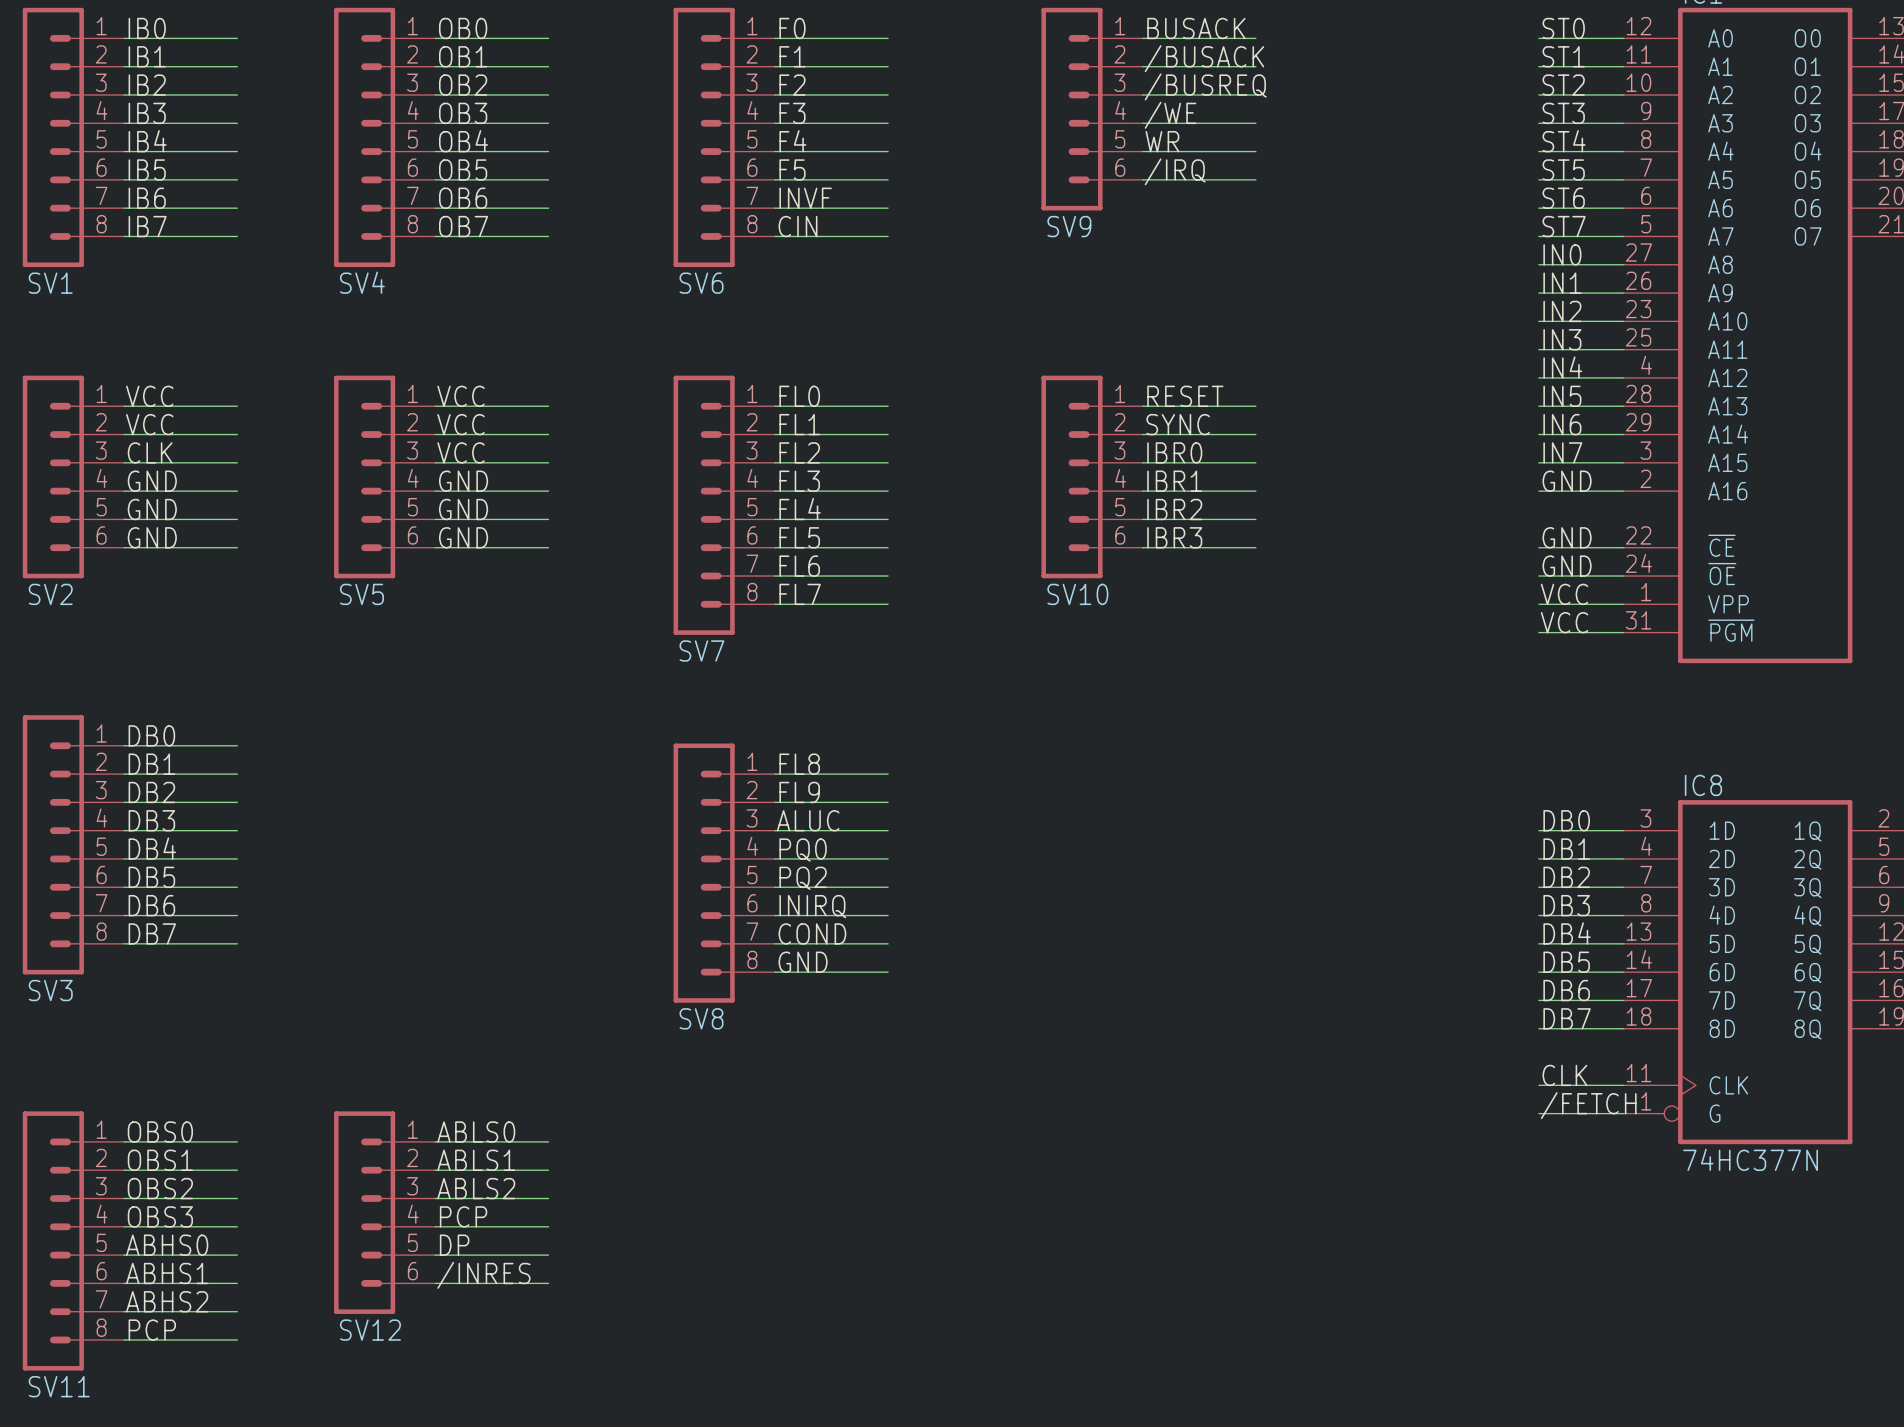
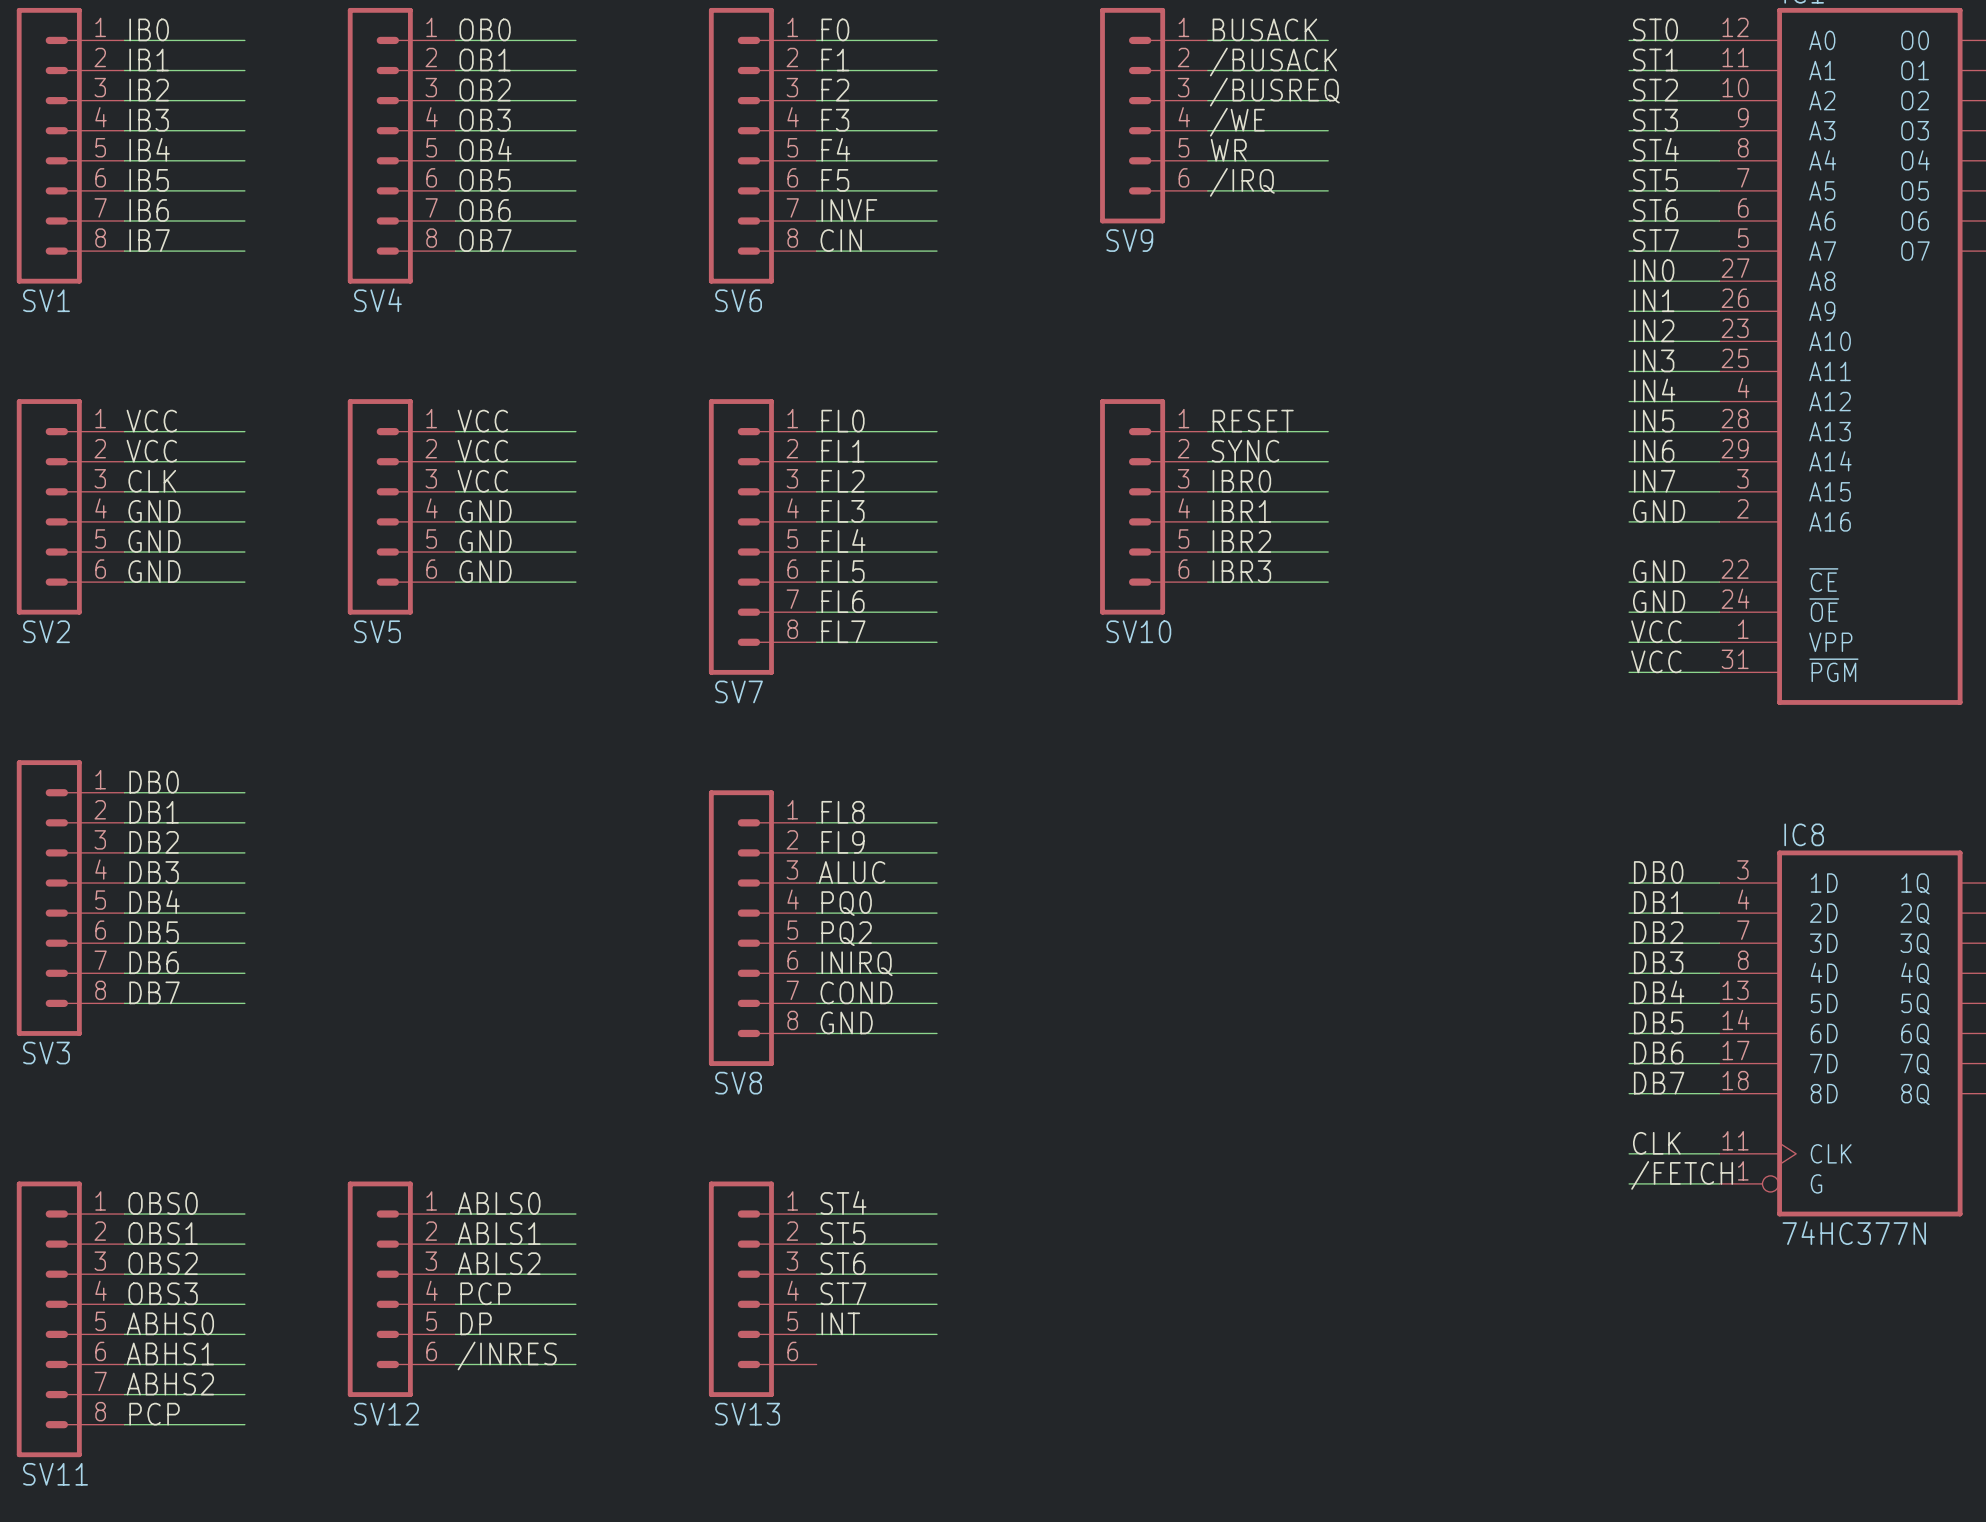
label: none -> ST4 (843, 1202)
wire: none -> (816, 1214) (937, 1214)
label: none -> ST5 (843, 1233)
wire: none -> (816, 1244) (937, 1244)
label: none -> ST6 (843, 1263)
wire: none -> (816, 1274) (937, 1274)
SV13: none -> (762, 1289)
label: none -> ST7 (843, 1293)
wire: none -> (816, 1304) (937, 1304)
label: none -> INT (840, 1323)
wire: none -> (816, 1334) (937, 1334)

